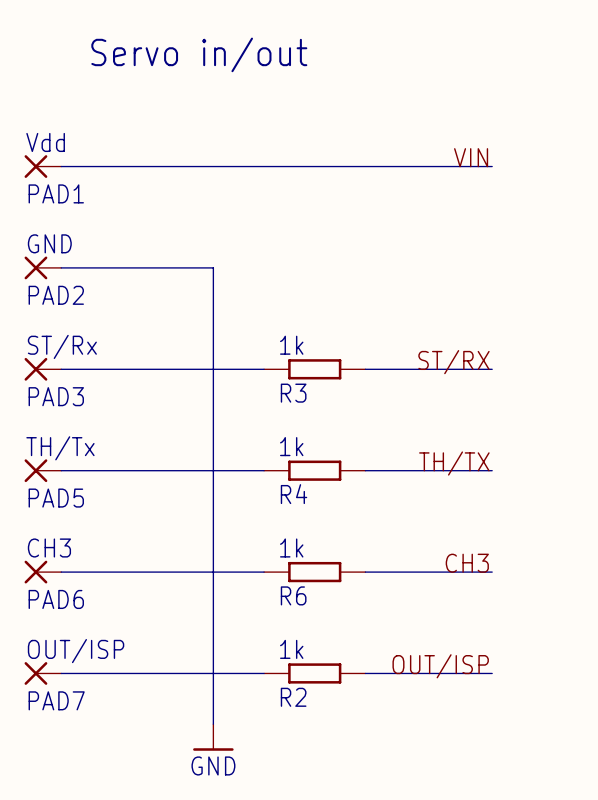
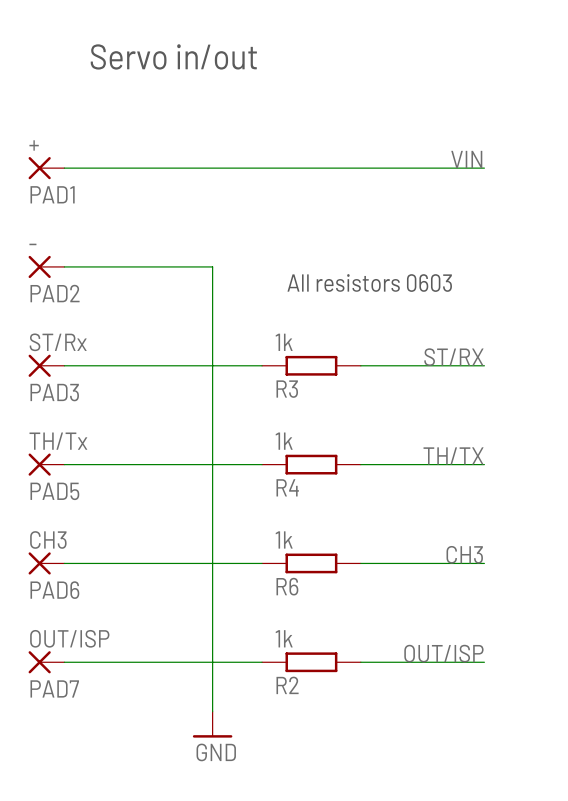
PAD1 value: Vdd (45, 142) -> + (34, 145)
PAD2 value: GND (49, 243) -> - (32, 244)
text: none -> All resistors 0603 (369, 283)

